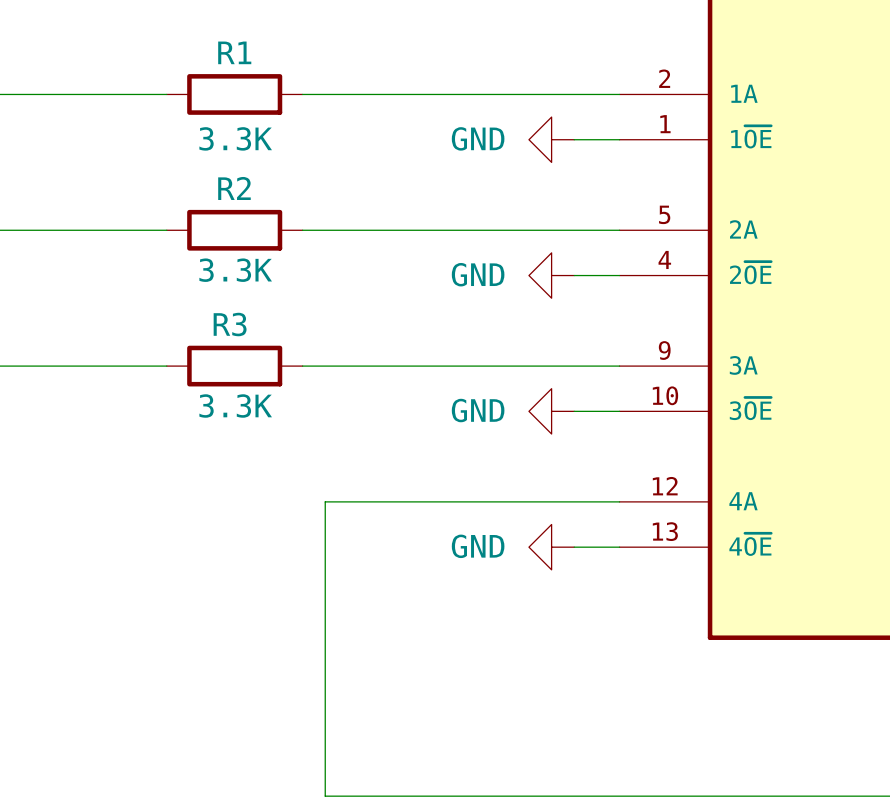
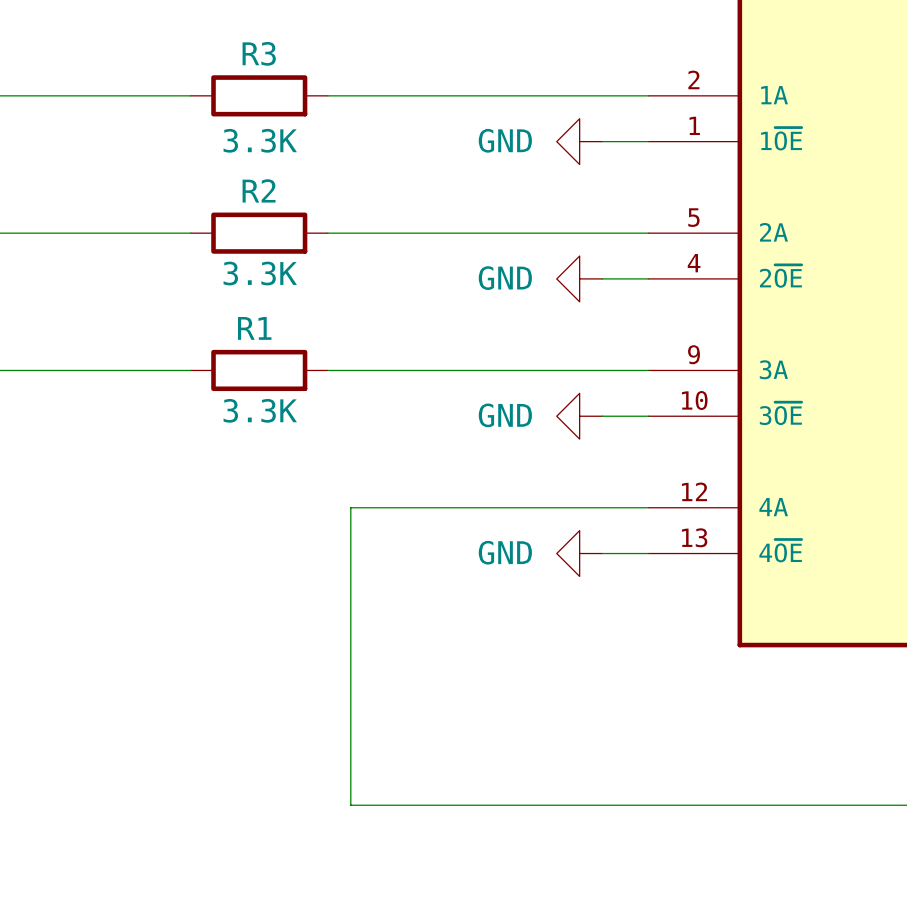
R1 name: R1 (234, 52) -> R3 (259, 53)
R3 name: R3 (230, 324) -> R1 (254, 328)

